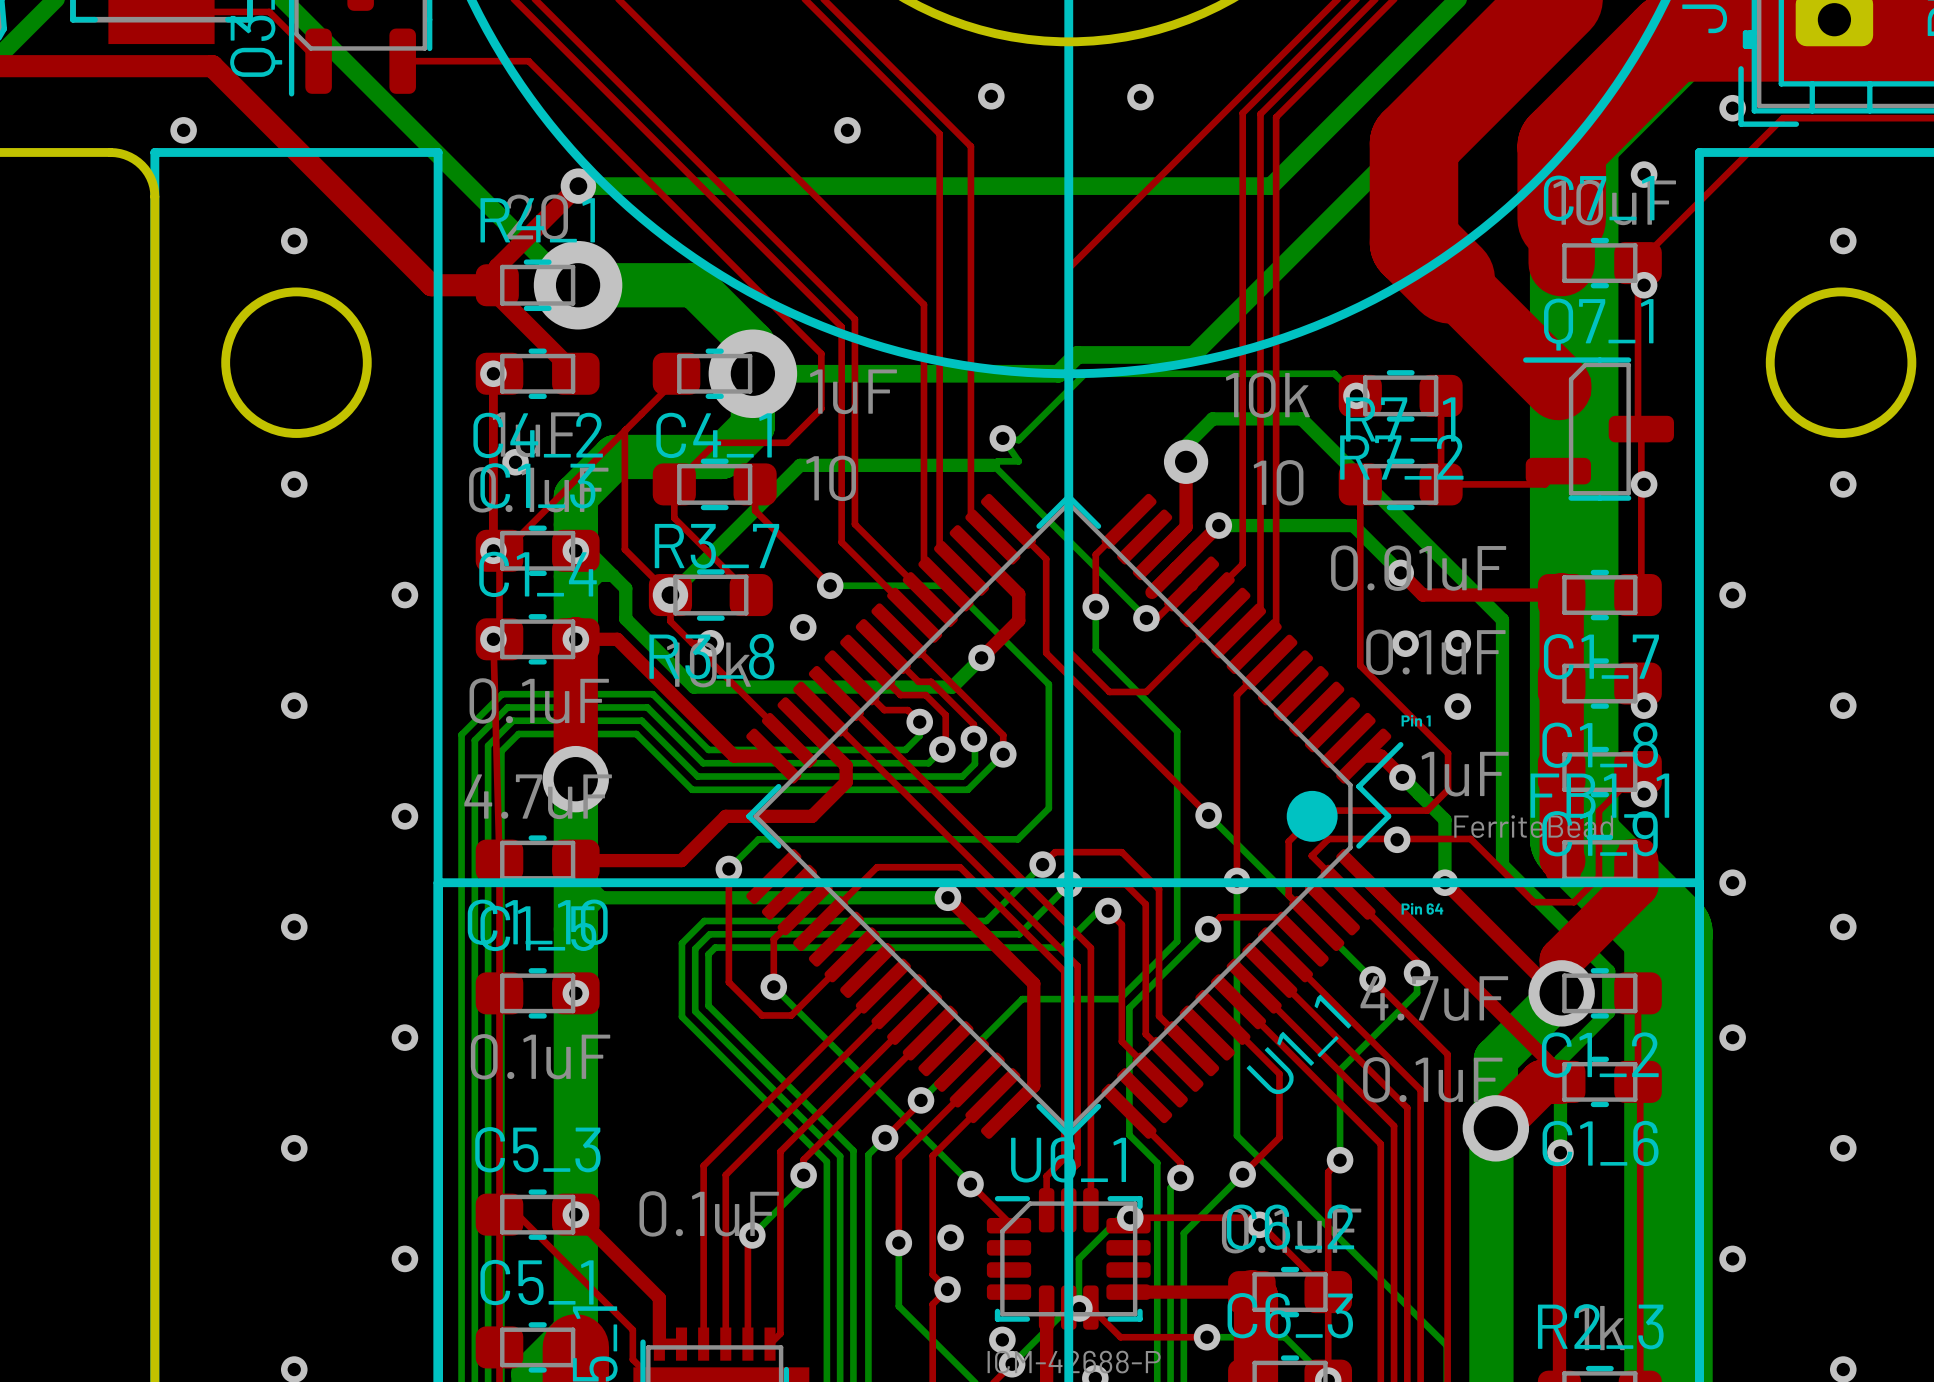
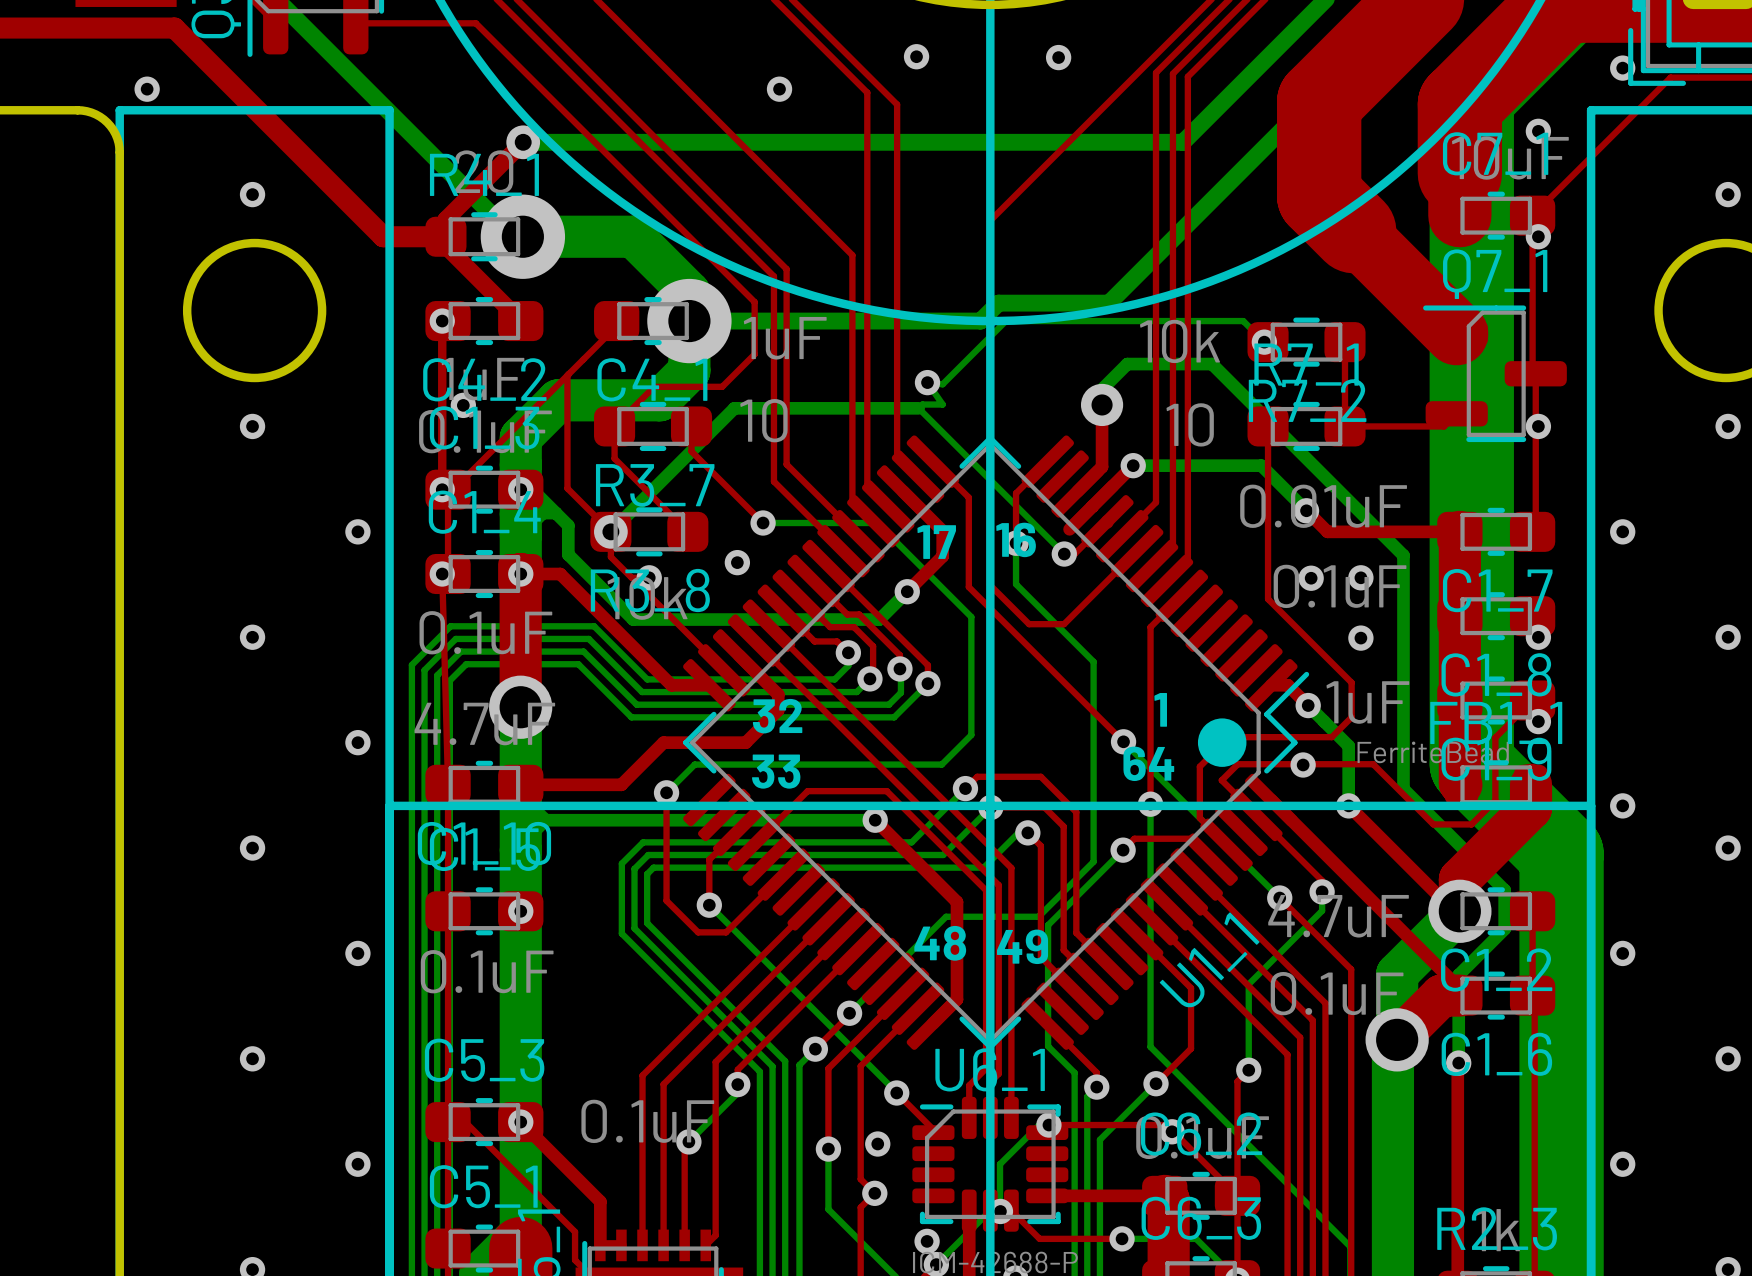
text: none -> 16 (1016, 539)
text: none -> 17 (936, 542)
text: Pin 1 (1416, 720) -> none
text: none -> 1 (1160, 709)
text: none -> 32 (777, 716)
text: none -> 64 (1148, 763)
text: none -> 33 (776, 771)
text: Pin 64 (1422, 908) -> none
text: none -> 48 (940, 943)
text: none -> 49 (1022, 946)

